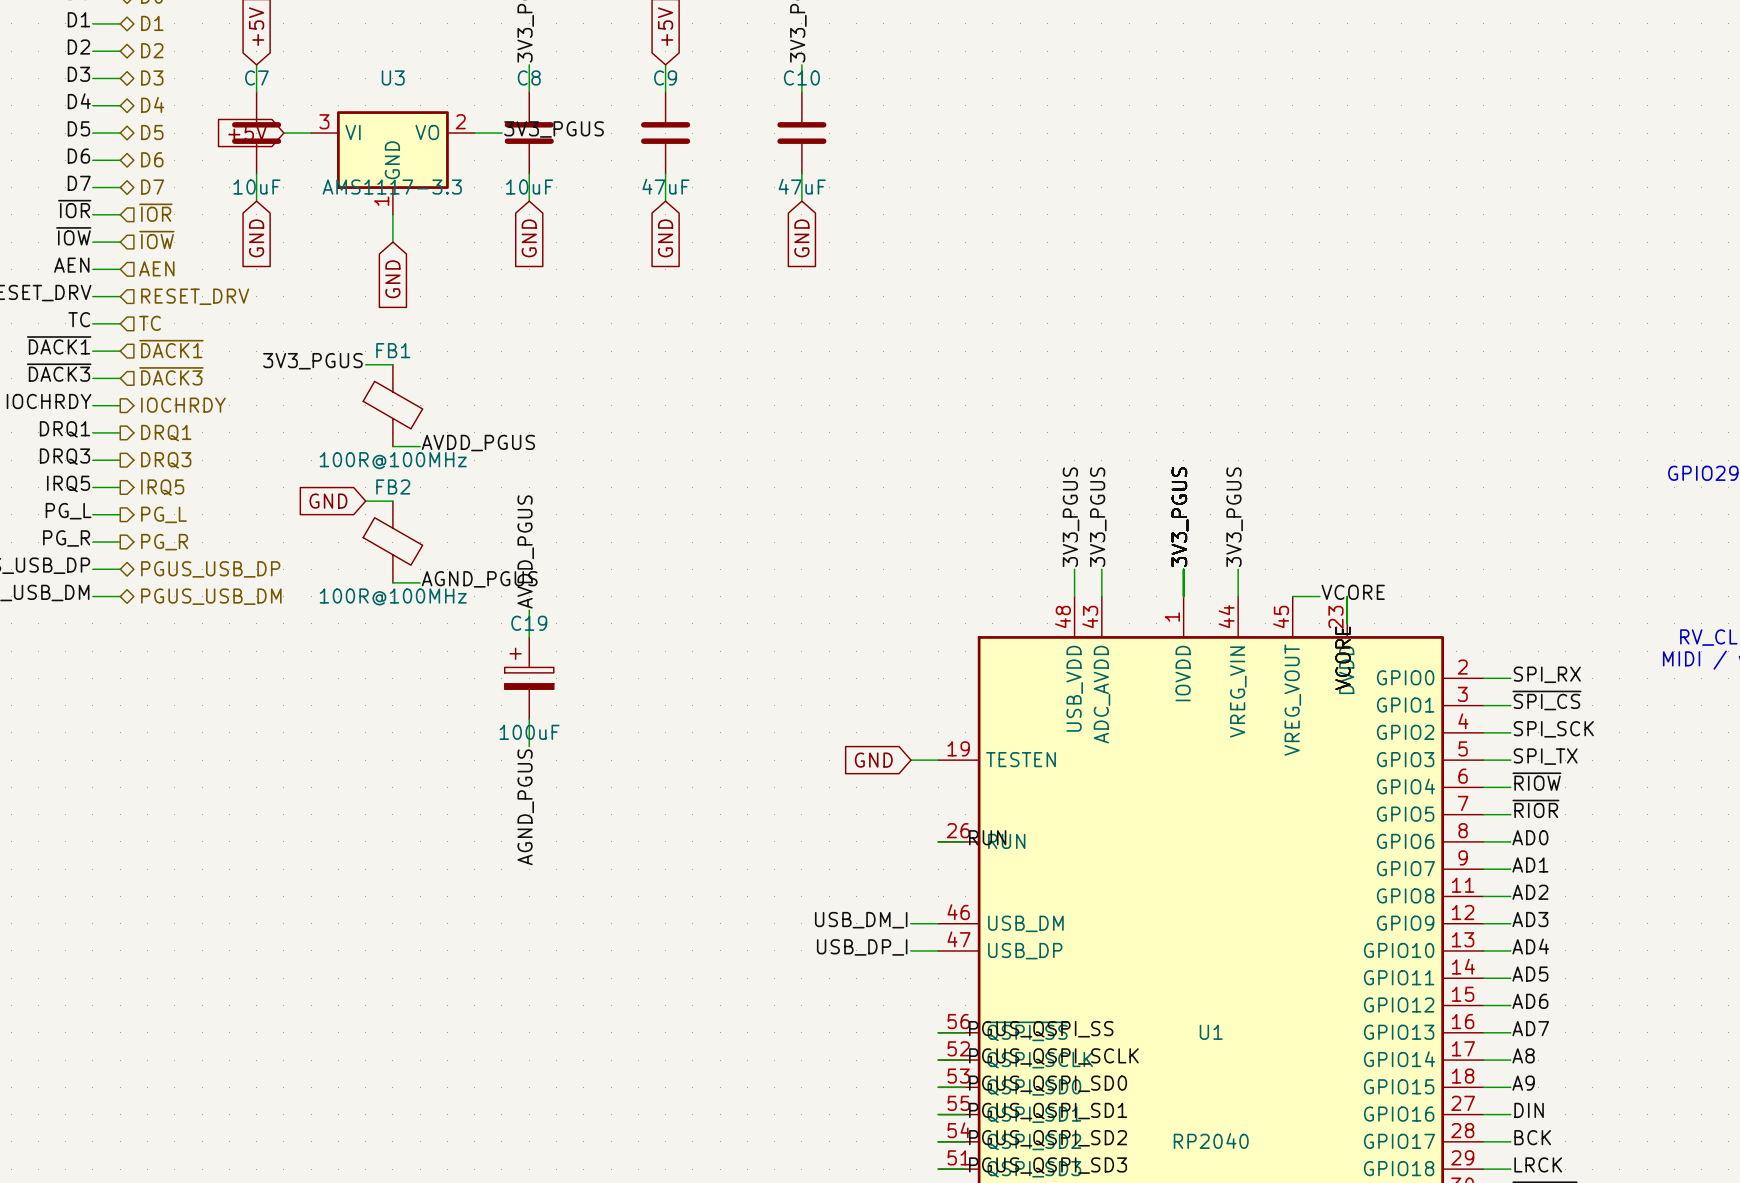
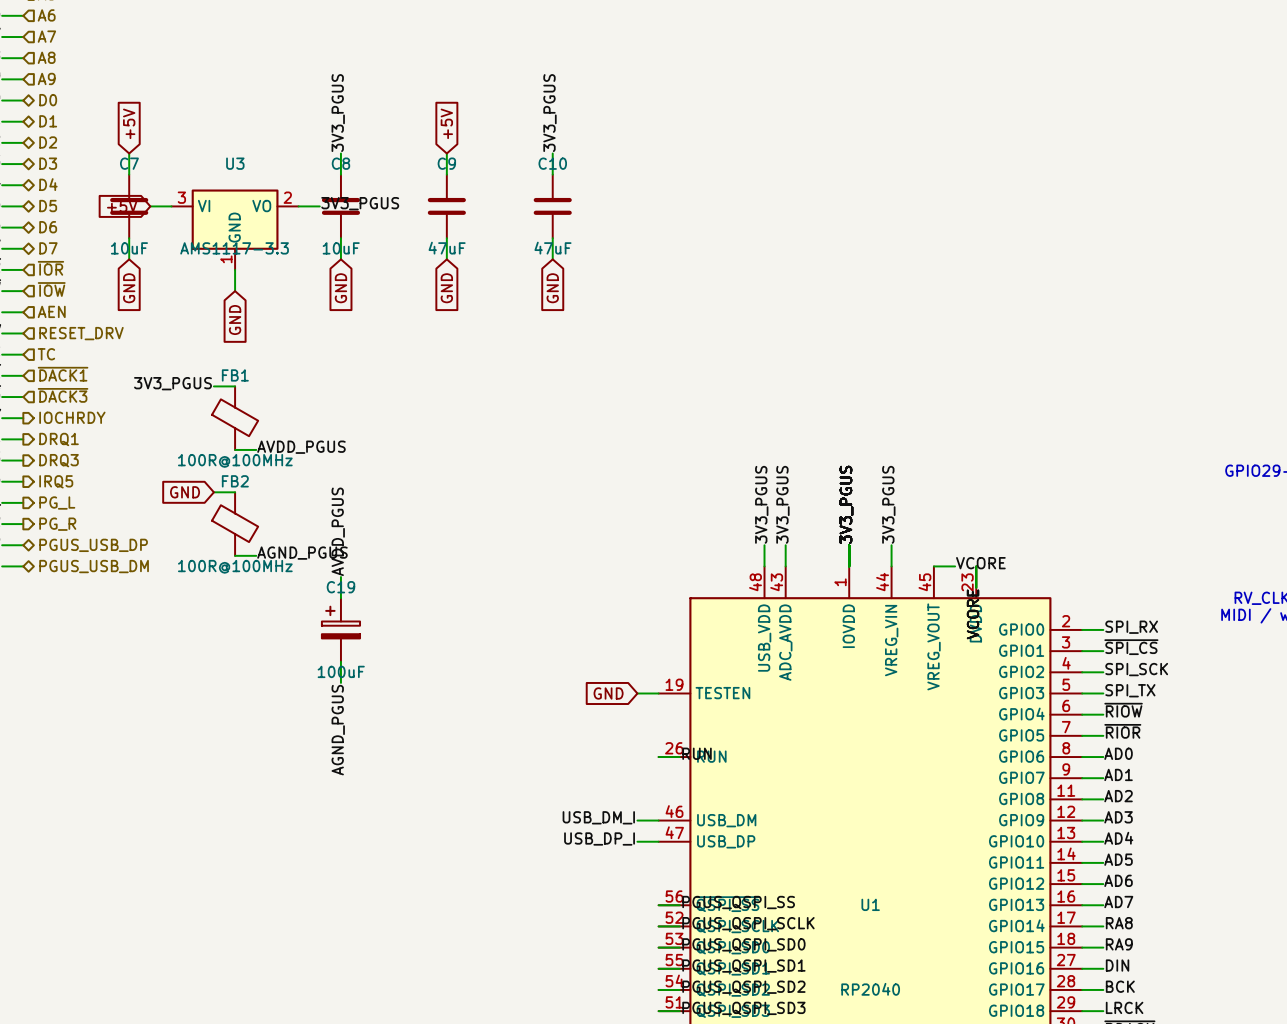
label: A8 (1523, 1055) -> RA8 (1119, 923)
label: A9 (1523, 1083) -> RA9 (1119, 944)

